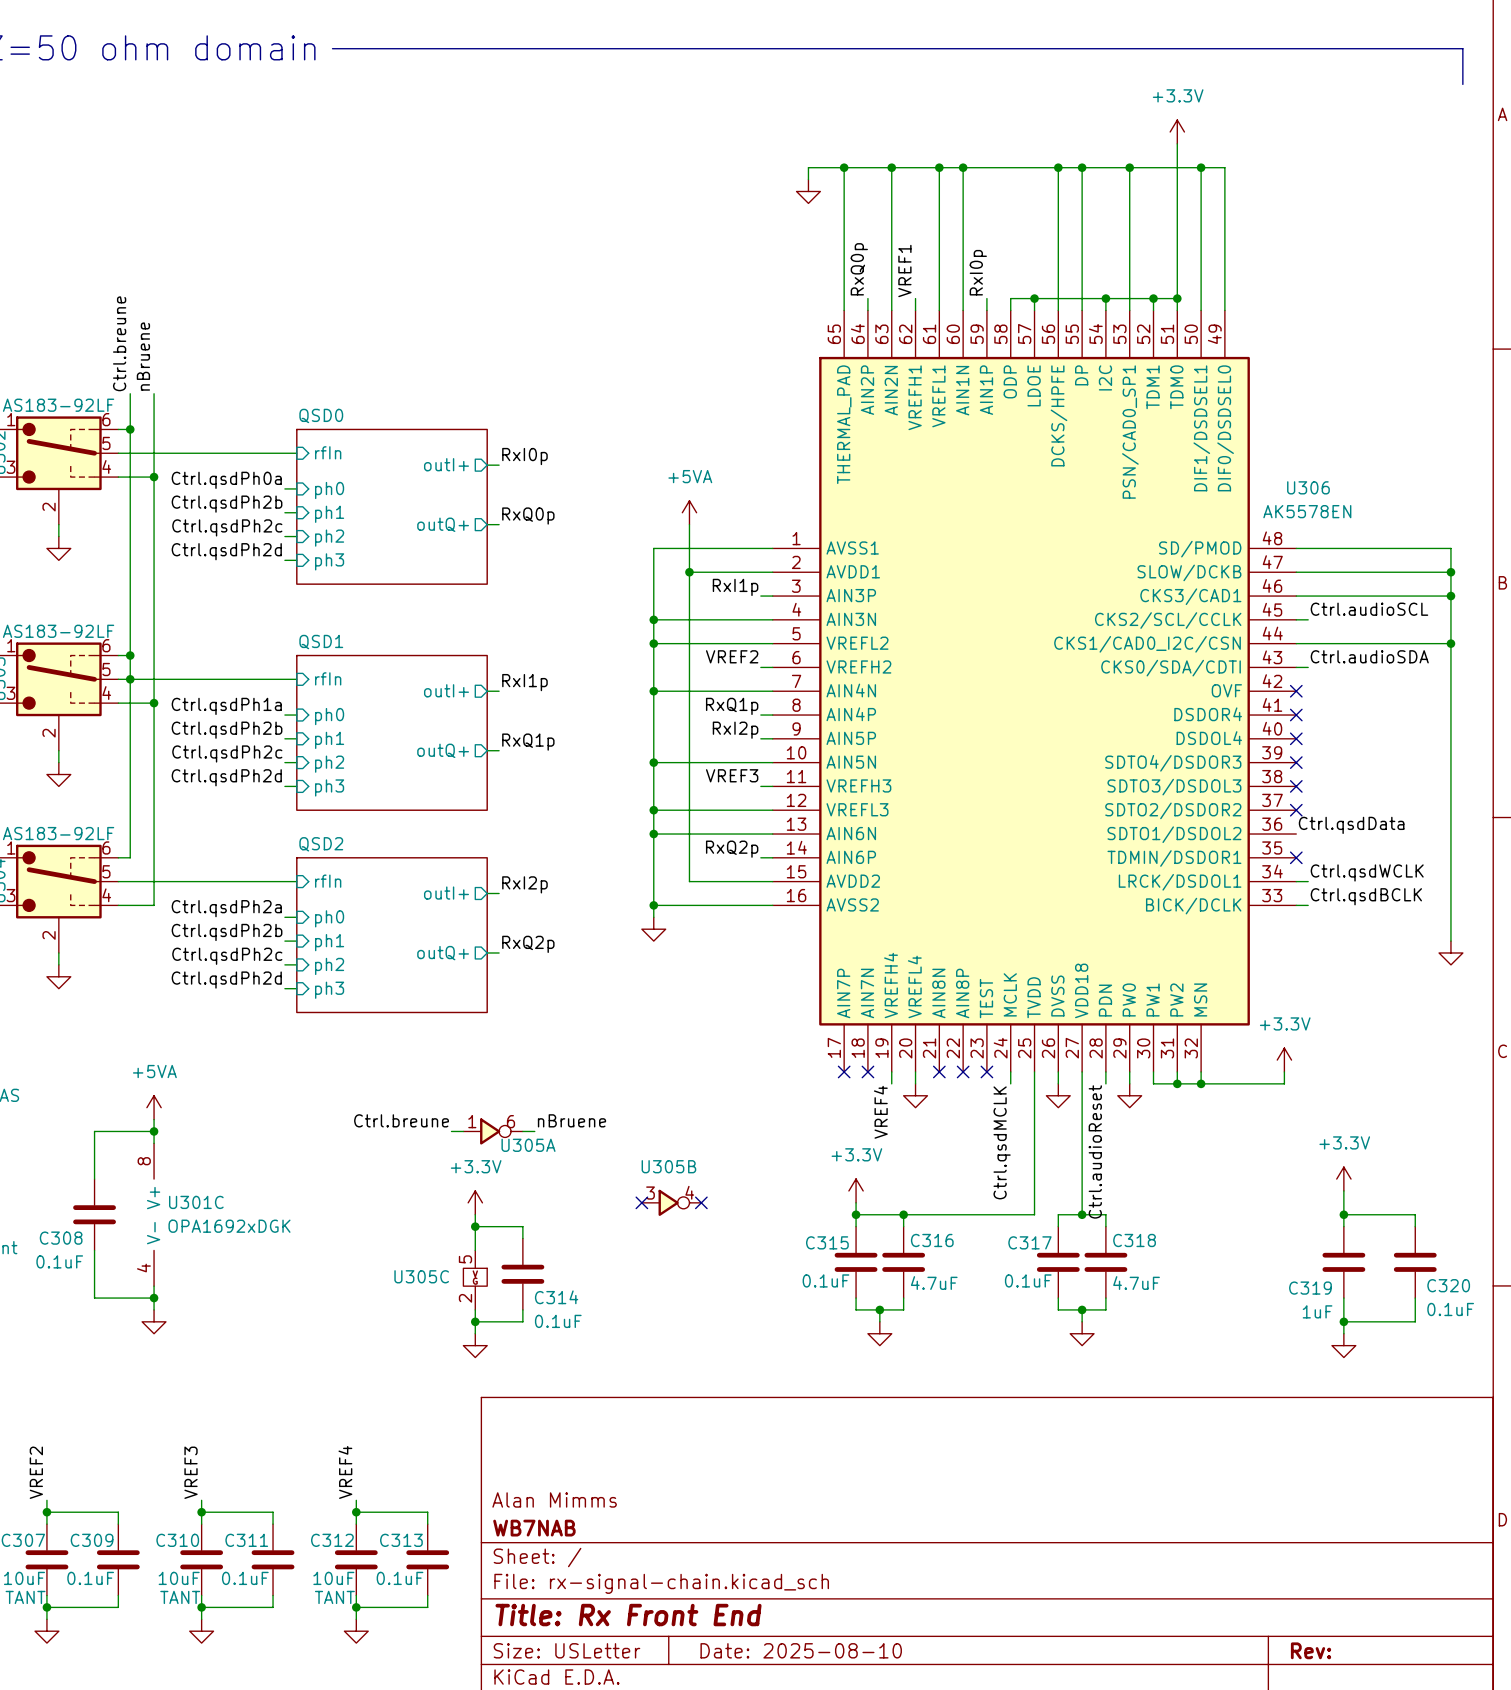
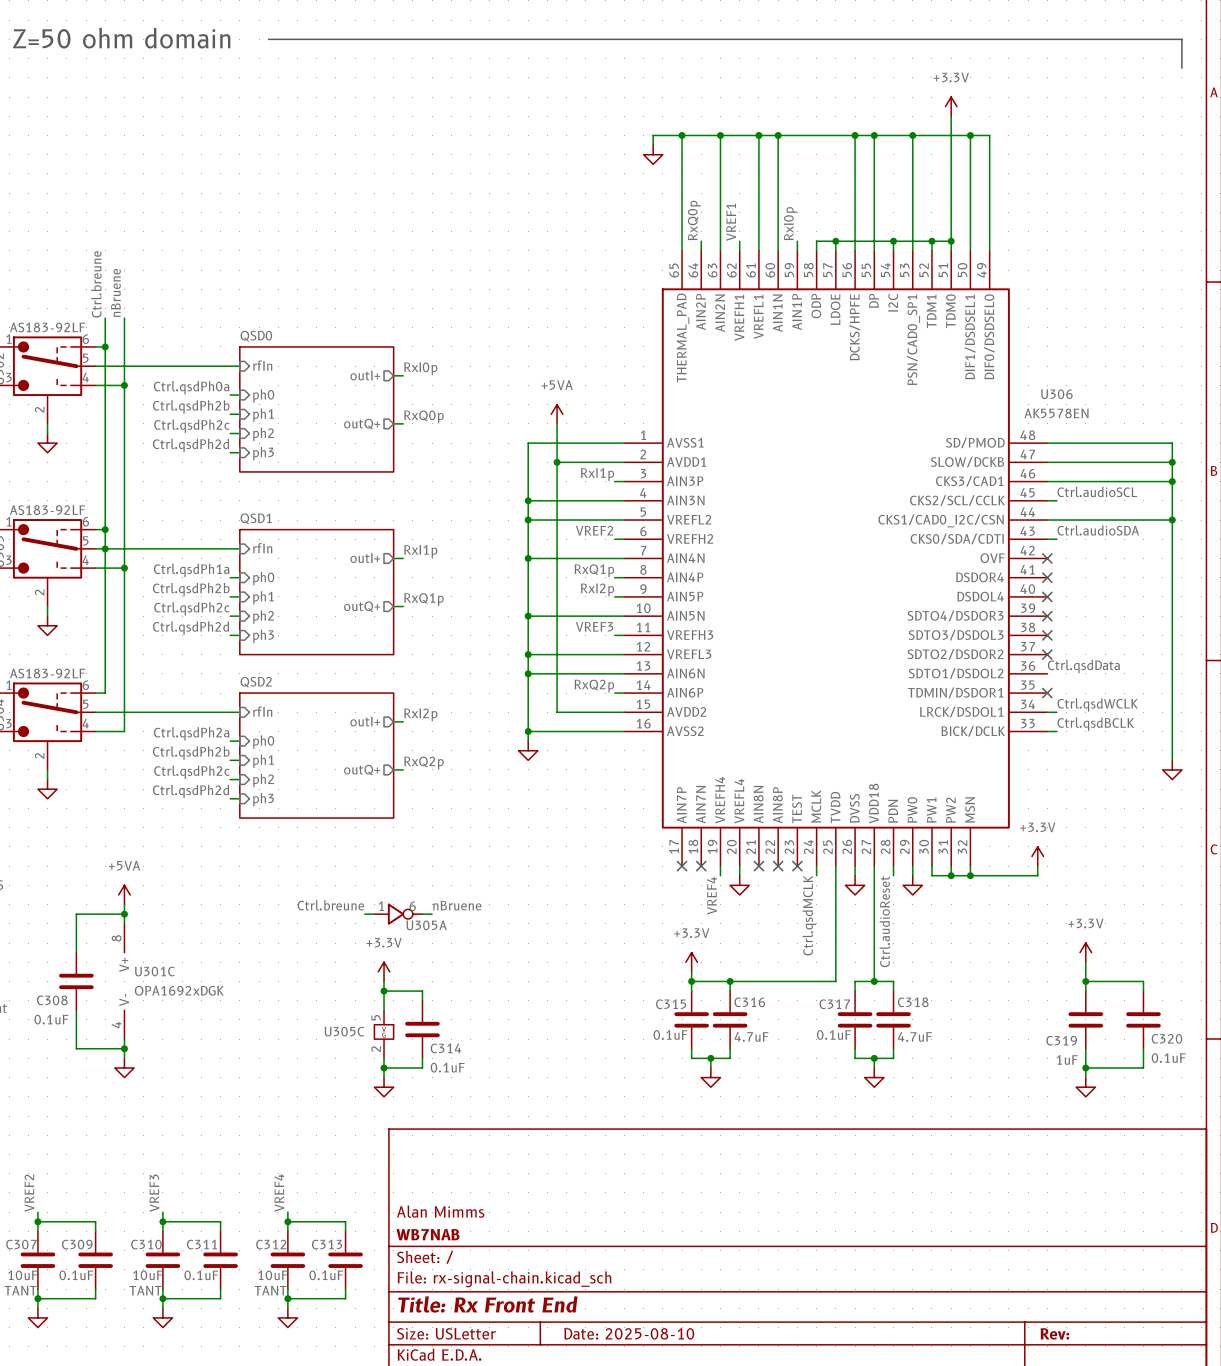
no-connect mark: (641, 1202) -> none
U305B: (671, 1202) -> none
no-connect mark: (701, 1202) -> none

